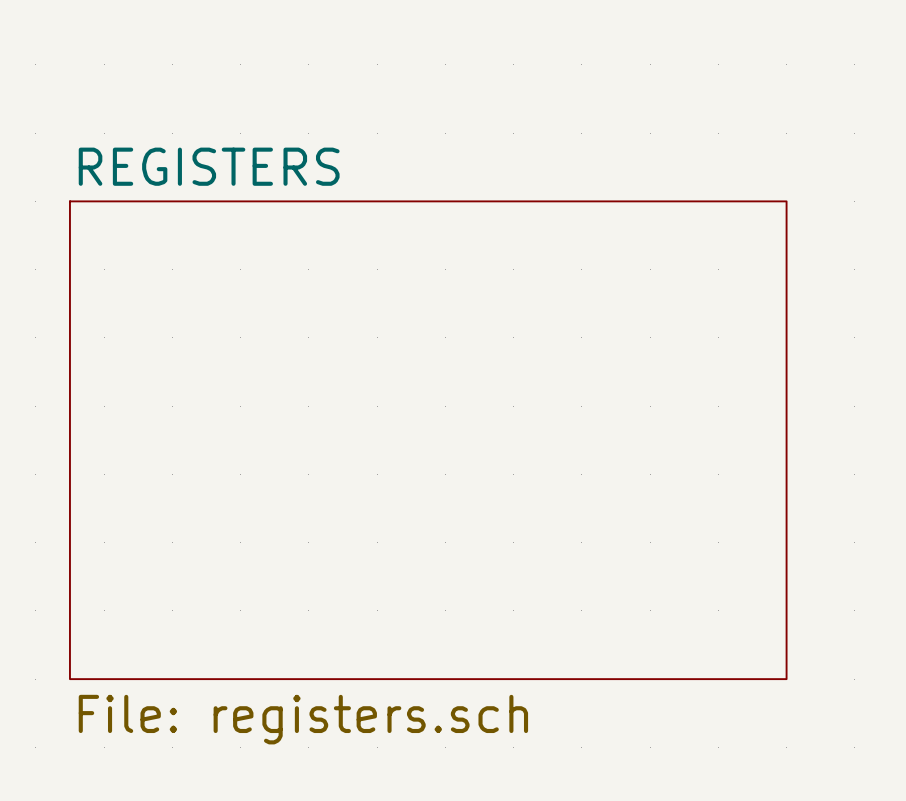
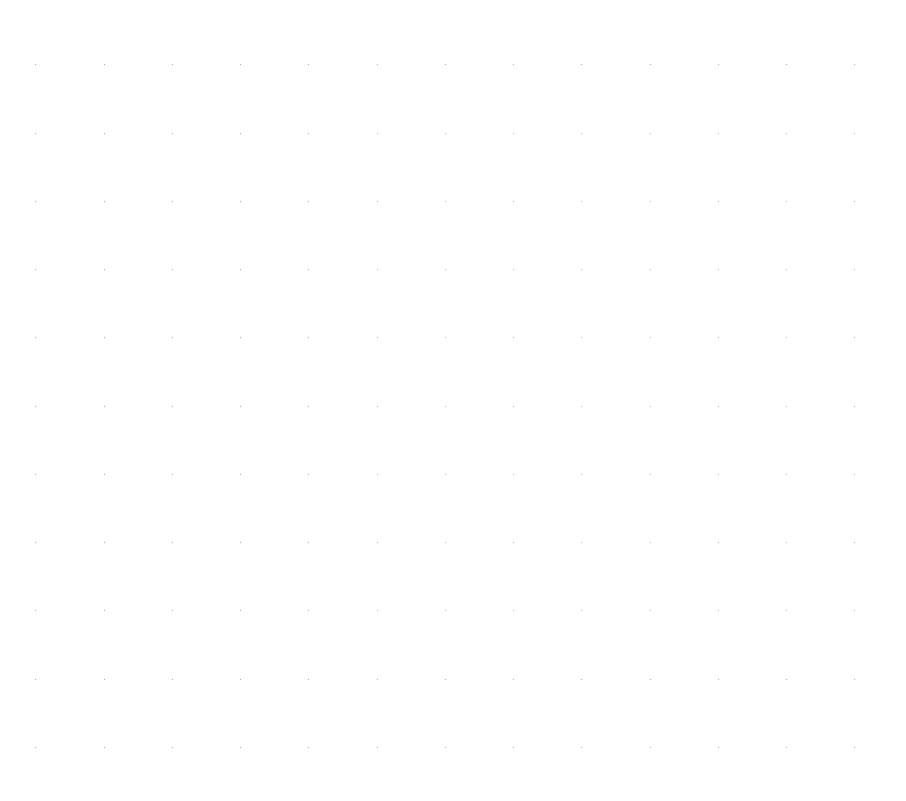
sheet REGISTERS: File: registers.sch (428, 440) -> none

